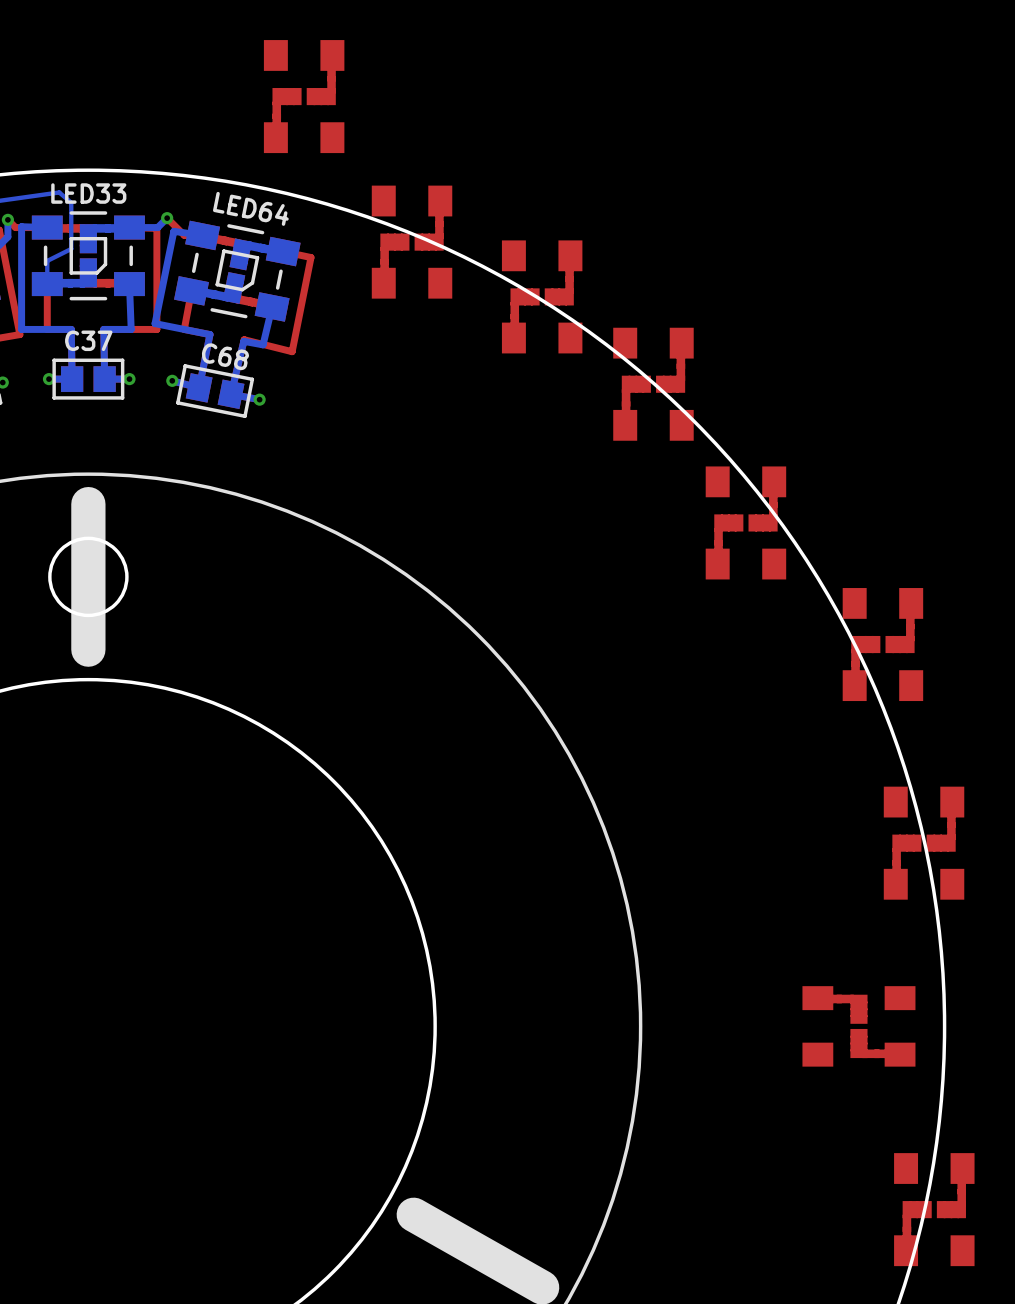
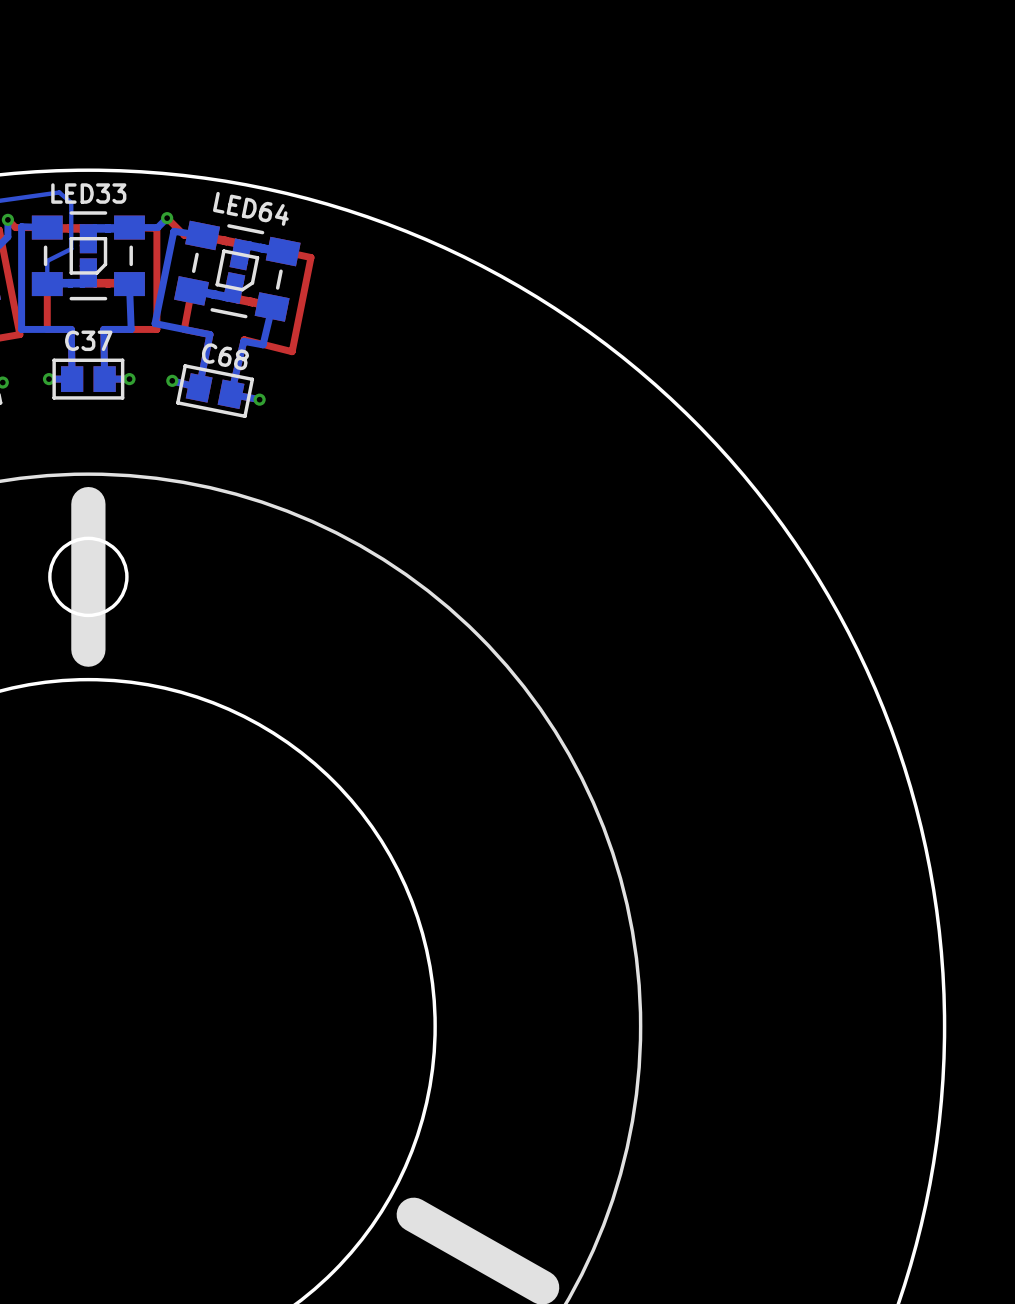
part: (304, 96) -> none
part: (412, 242) -> none
part: (542, 296) -> none
part: (653, 384) -> none
part: (745, 522) -> none
part: (882, 644) -> none
part: (924, 843) -> none
part: (858, 1026) -> none
part: (934, 1209) -> none

